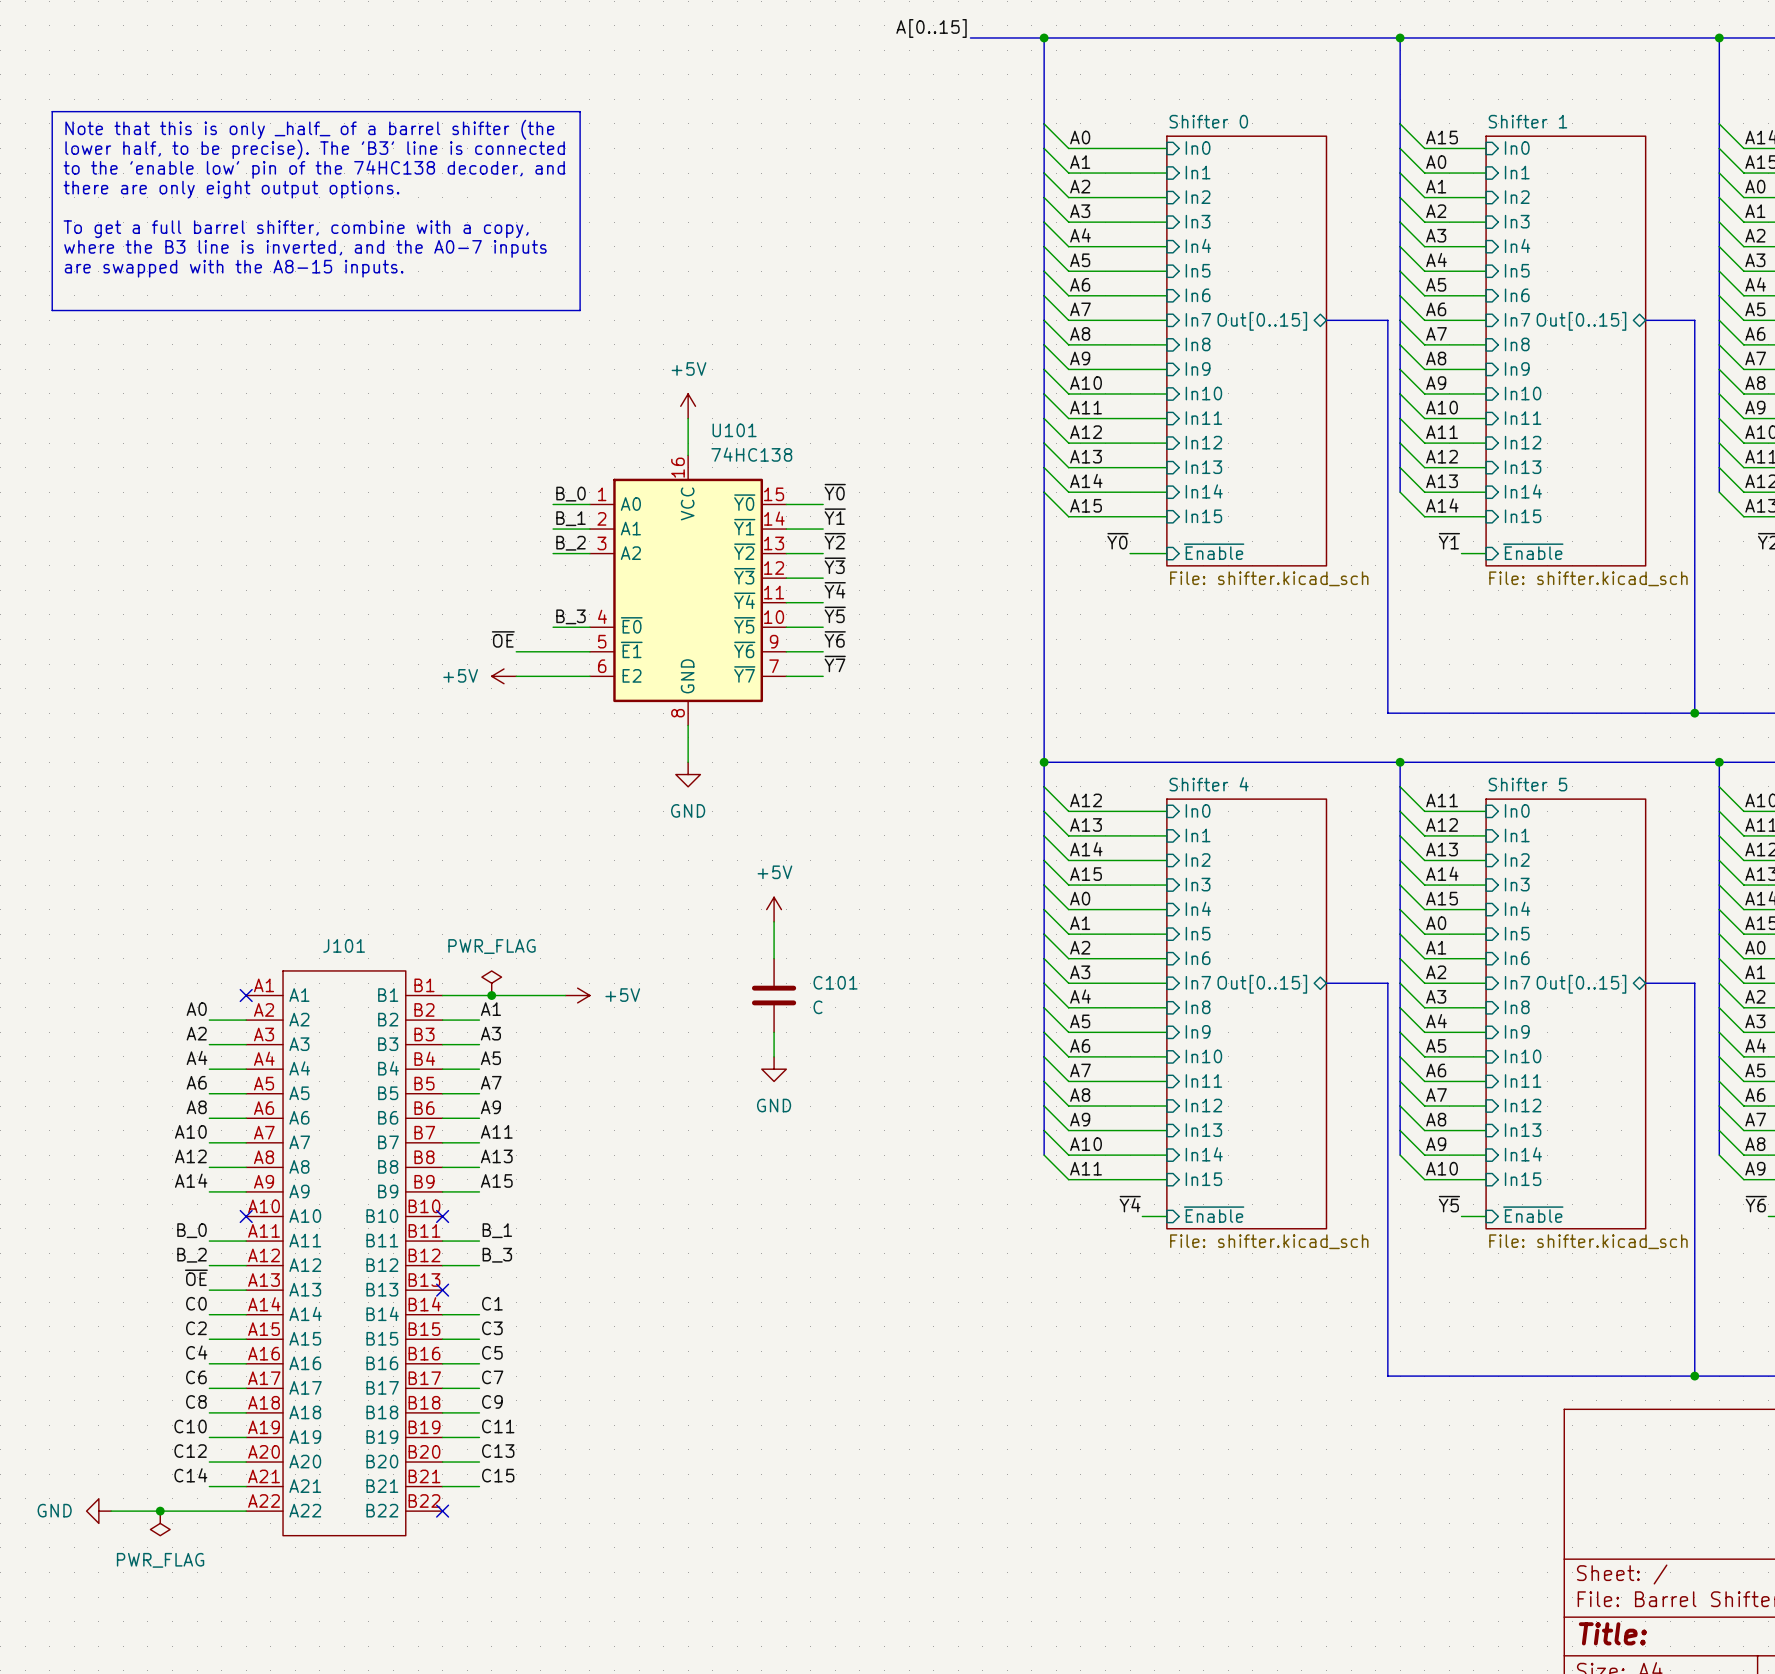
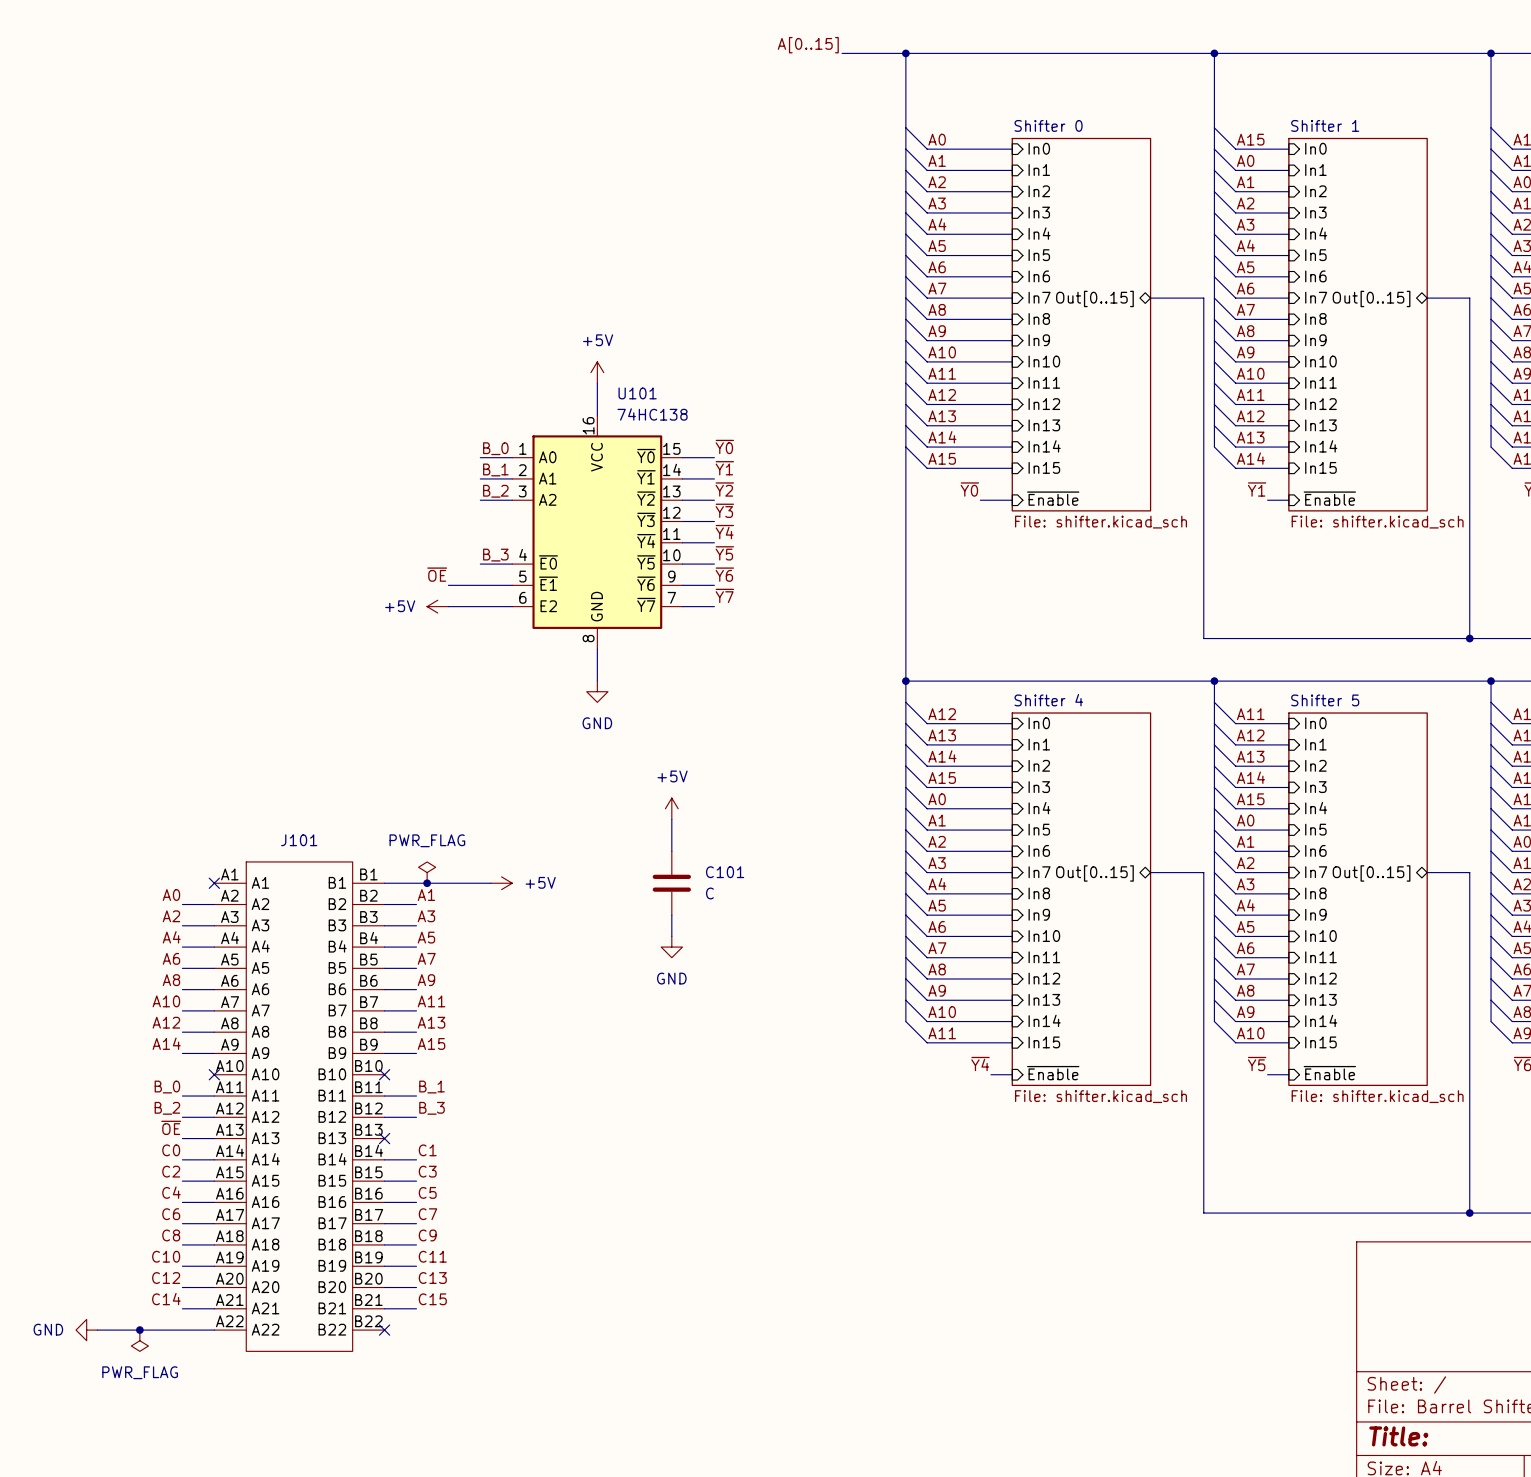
line: (52, 111) (580, 111) (580, 310) (52, 310) (52, 111) -> none
text: Note that this is only _half_ of a barrel shifter (the (309, 129) -> none
text: lower half, to be precise). The 'B3' line is connected (315, 149) -> none
text: to the 'enable low' pin of the 74HC138 decoder, and (314, 169) -> none
text: there are only eight output options. (231, 189) -> none
text: To get a full barrel shifter, combine with a copy, (296, 229) -> none
text: where the B3 line is inverted, and the A0-7 inputs (305, 248) -> none
text: are swapped with the A8-15 inputs. (234, 268) -> none

